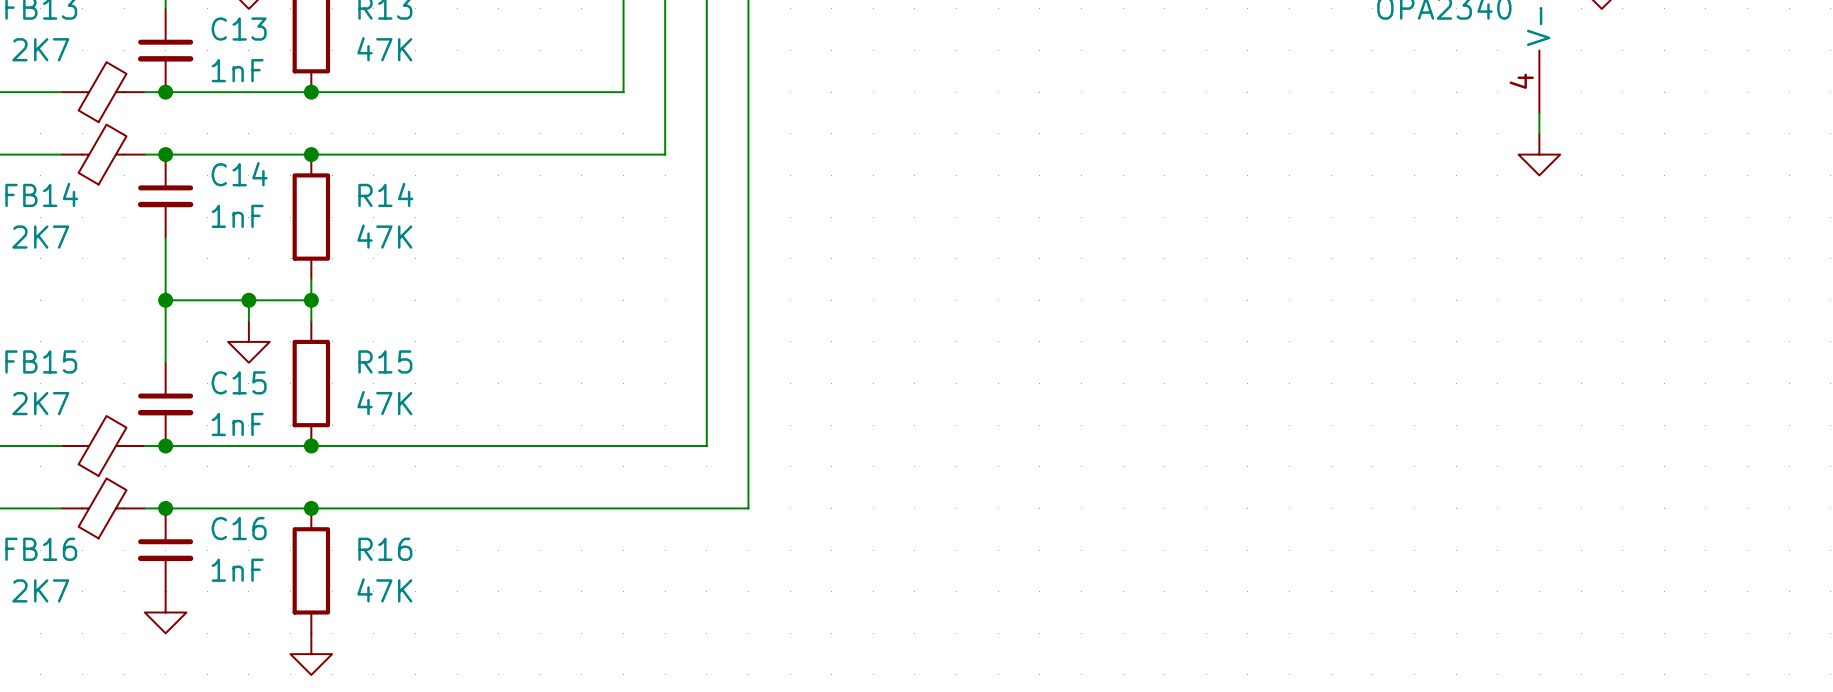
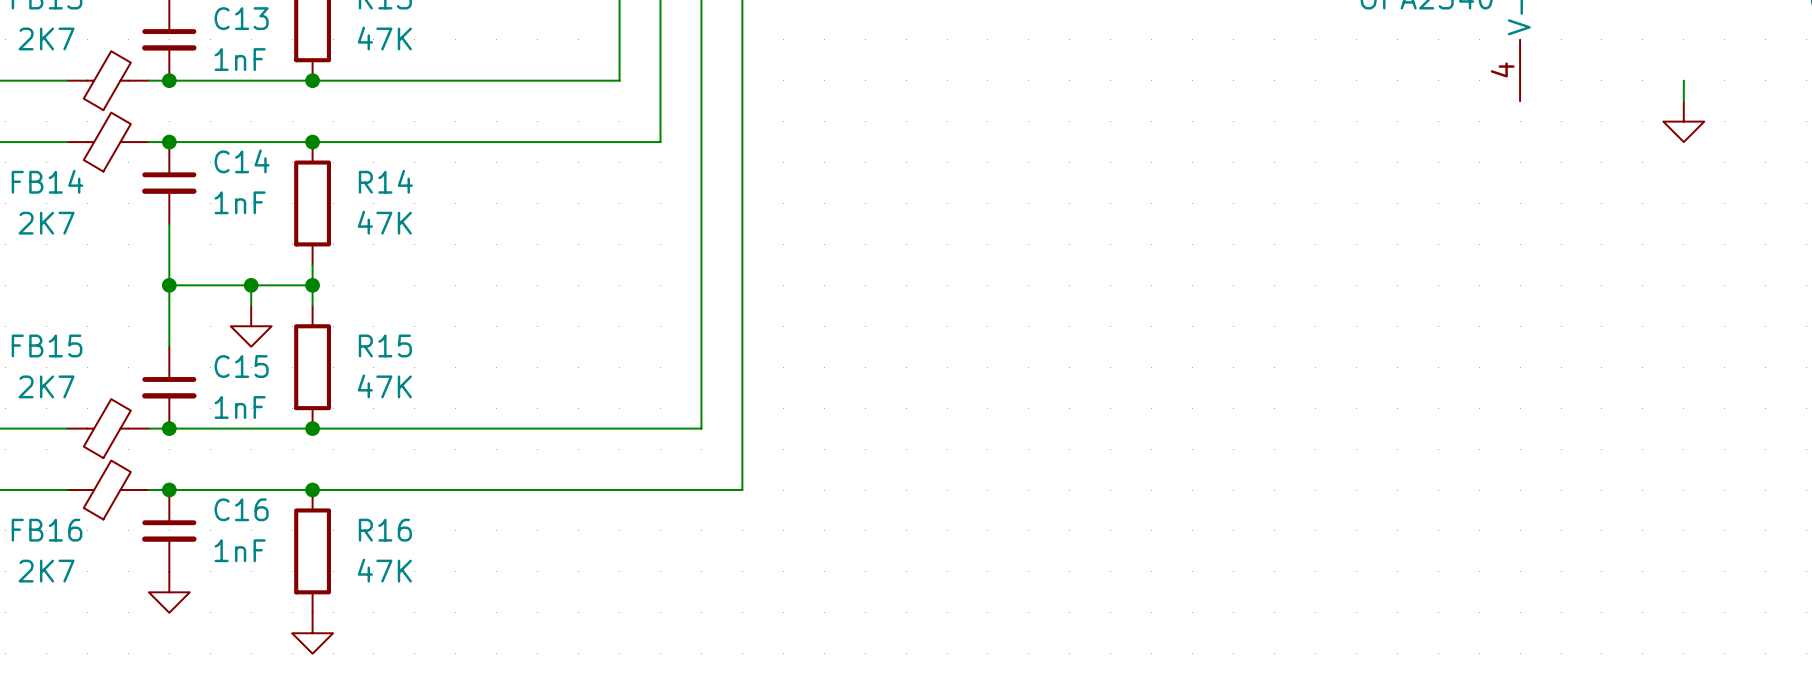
wire: (1539, 112) (1539, 133) -> (1683, 80) (1683, 101)
power symbol: none -> (1683, 121)
power symbol: (1539, 154) -> none

